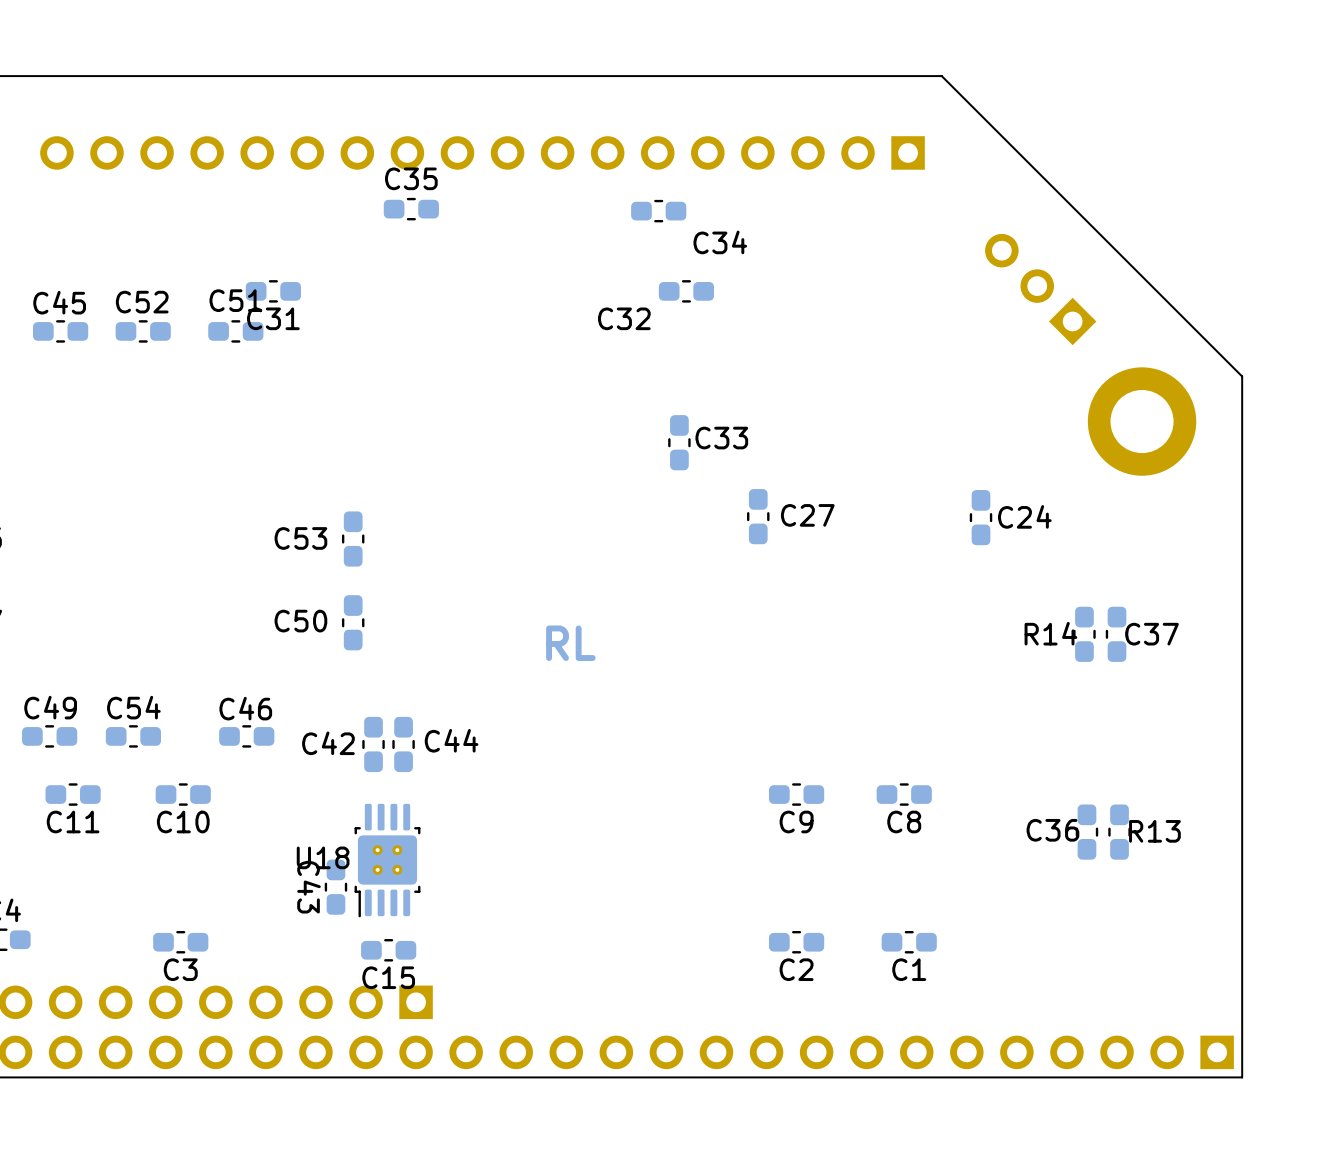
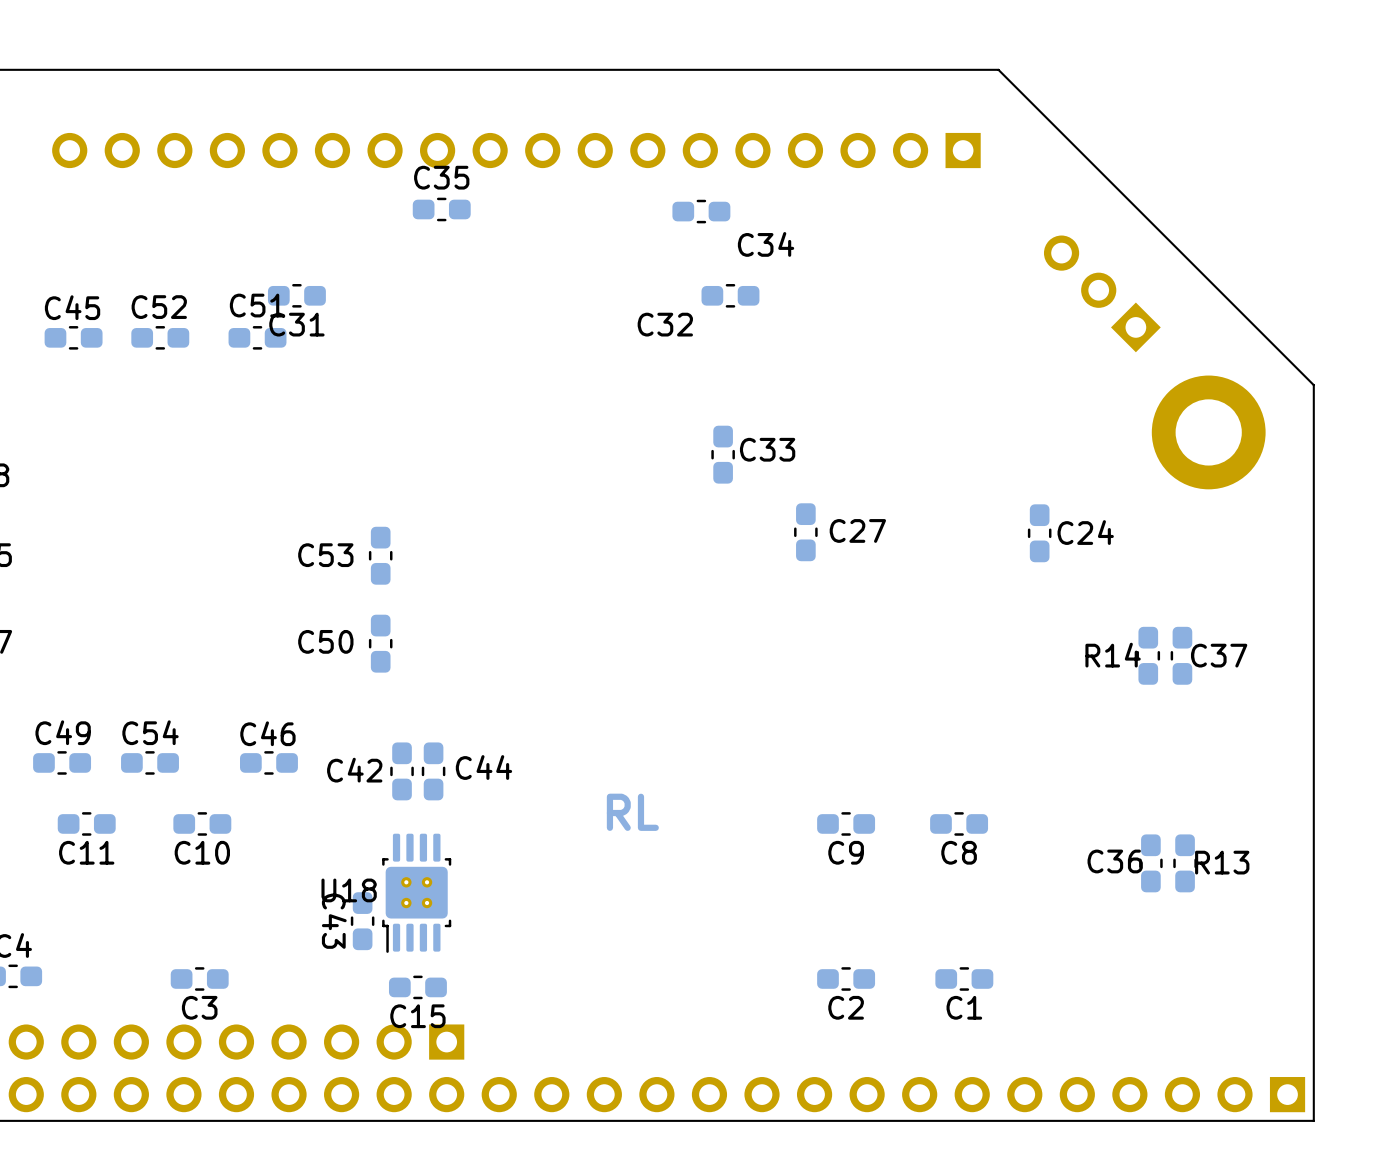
text position: RL (570, 643) -> RL (632, 812)

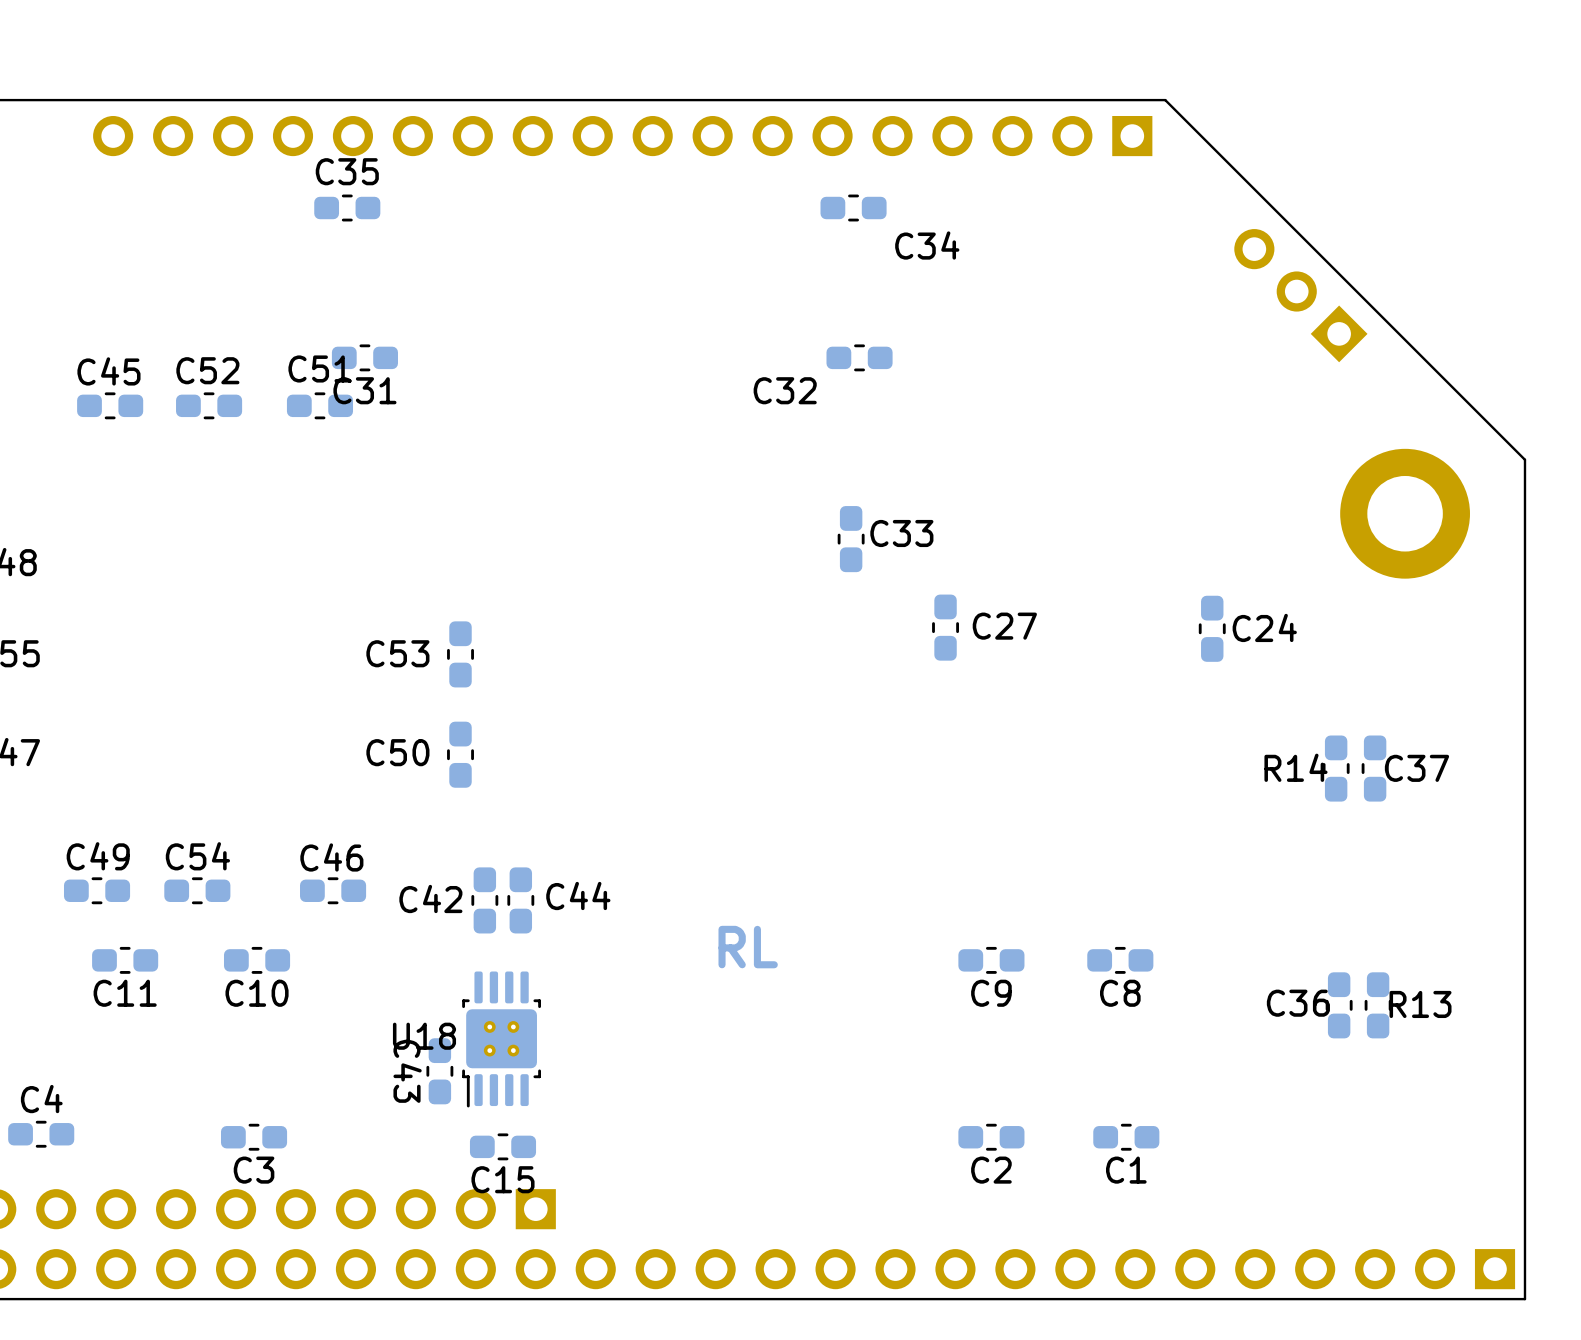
part position: (516, 150) -> (622, 136)
C35 position: (441, 209) -> (347, 208)
C34 position: (701, 211) -> (853, 208)
part position: (1102, 293) -> (1300, 295)

